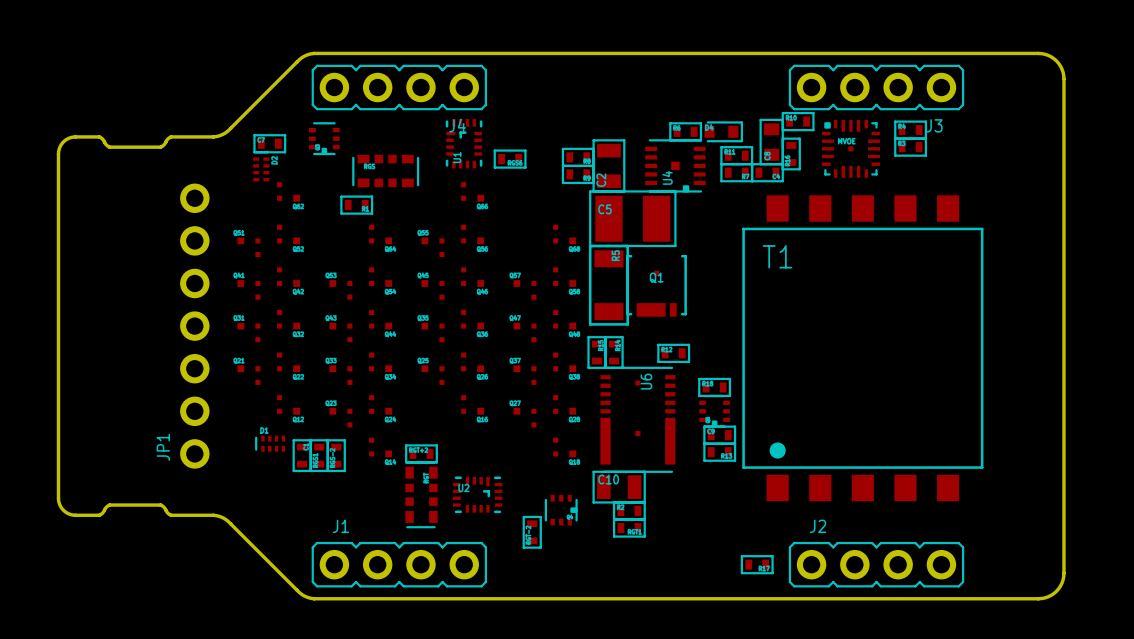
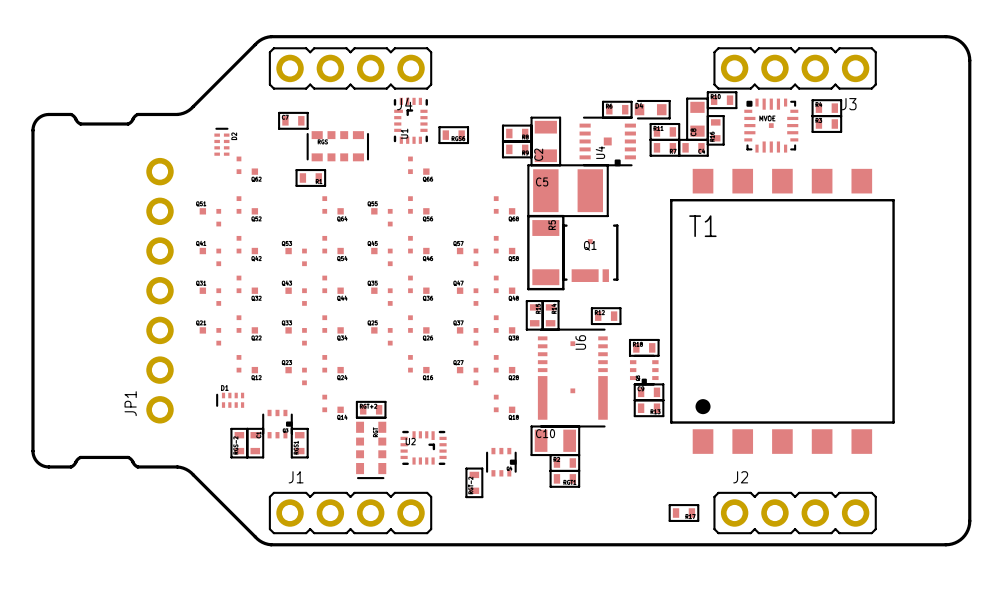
part rotation: 0° (324, 138) -> 90° counterclockwise (277, 424)
part position: (324, 138) -> (277, 424)
part position: (269, 143) -> (293, 120)
part position: (302, 455) -> (255, 443)
part position: (319, 455) -> (299, 443)
part position: (336, 455) -> (239, 443)

